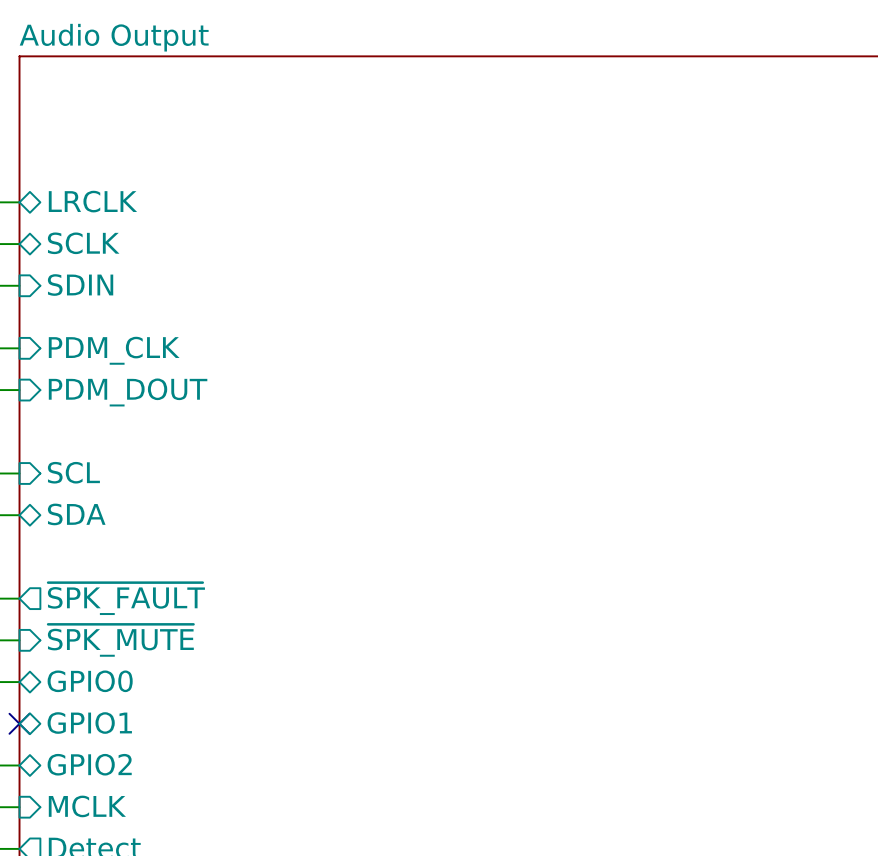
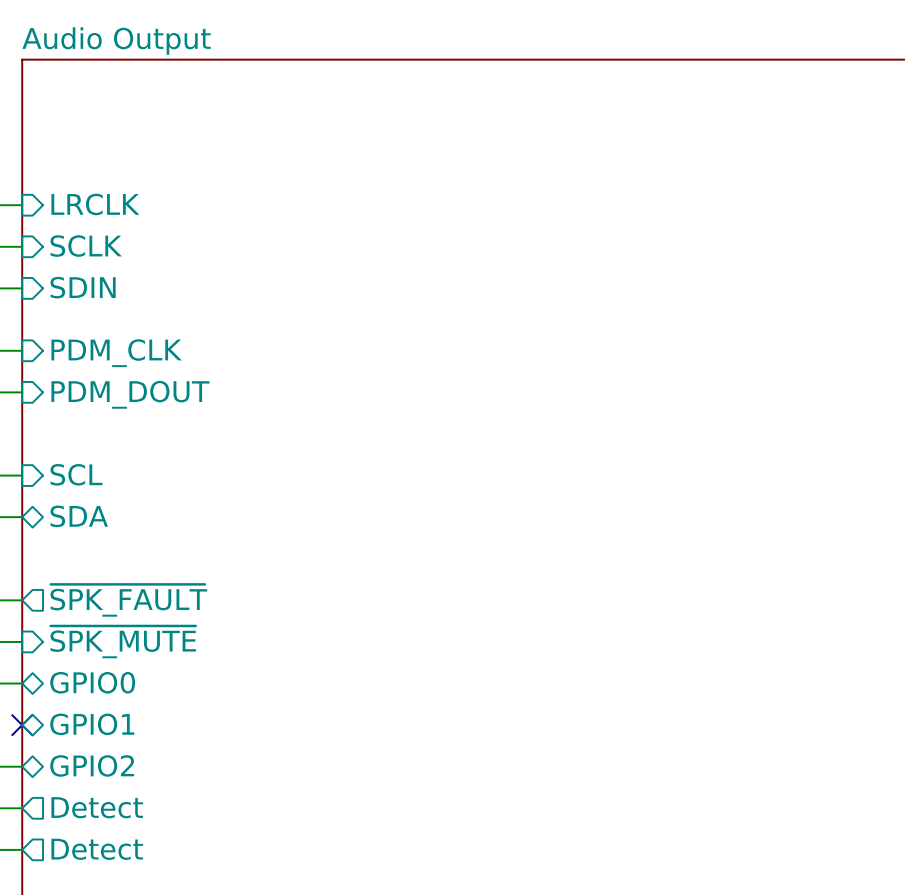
sheet pin shape: bidirectional (92, 201) -> input (95, 204)
sheet pin shape: bidirectional (83, 243) -> input (86, 246)
sheet pin shape: input (87, 806) -> output (97, 807)
sheet pin: MCLK (87, 806) -> Detect (97, 807)

